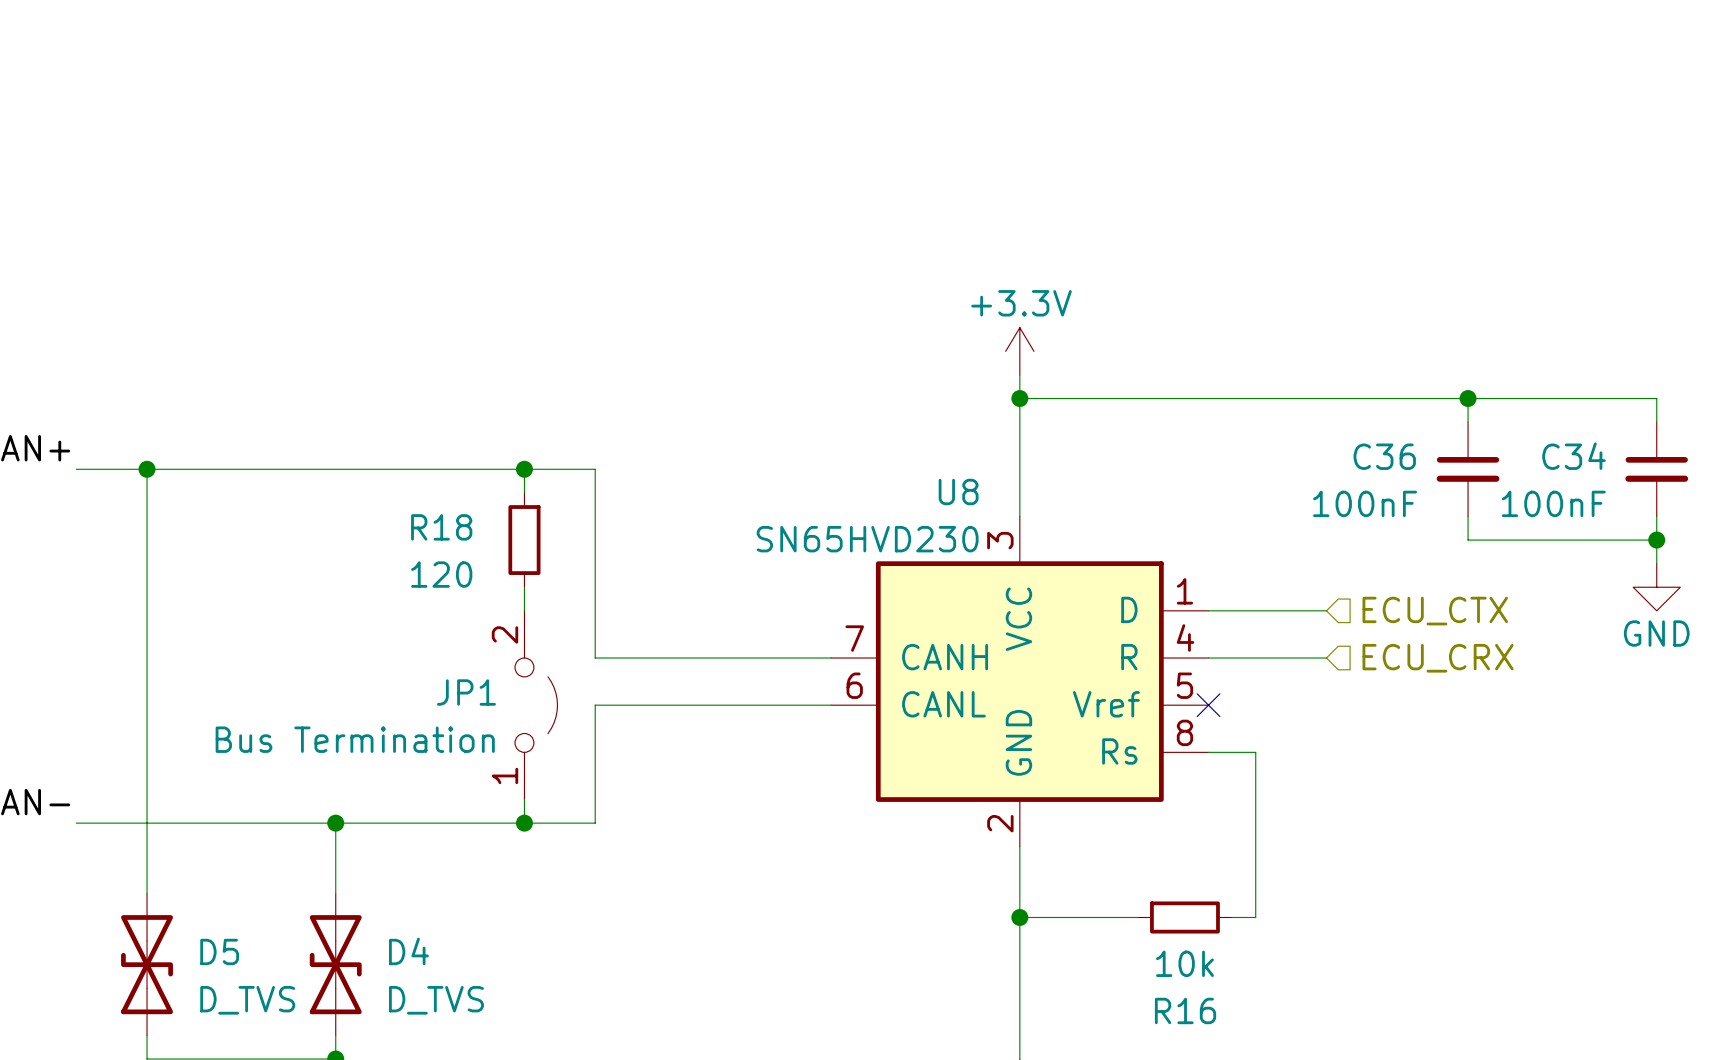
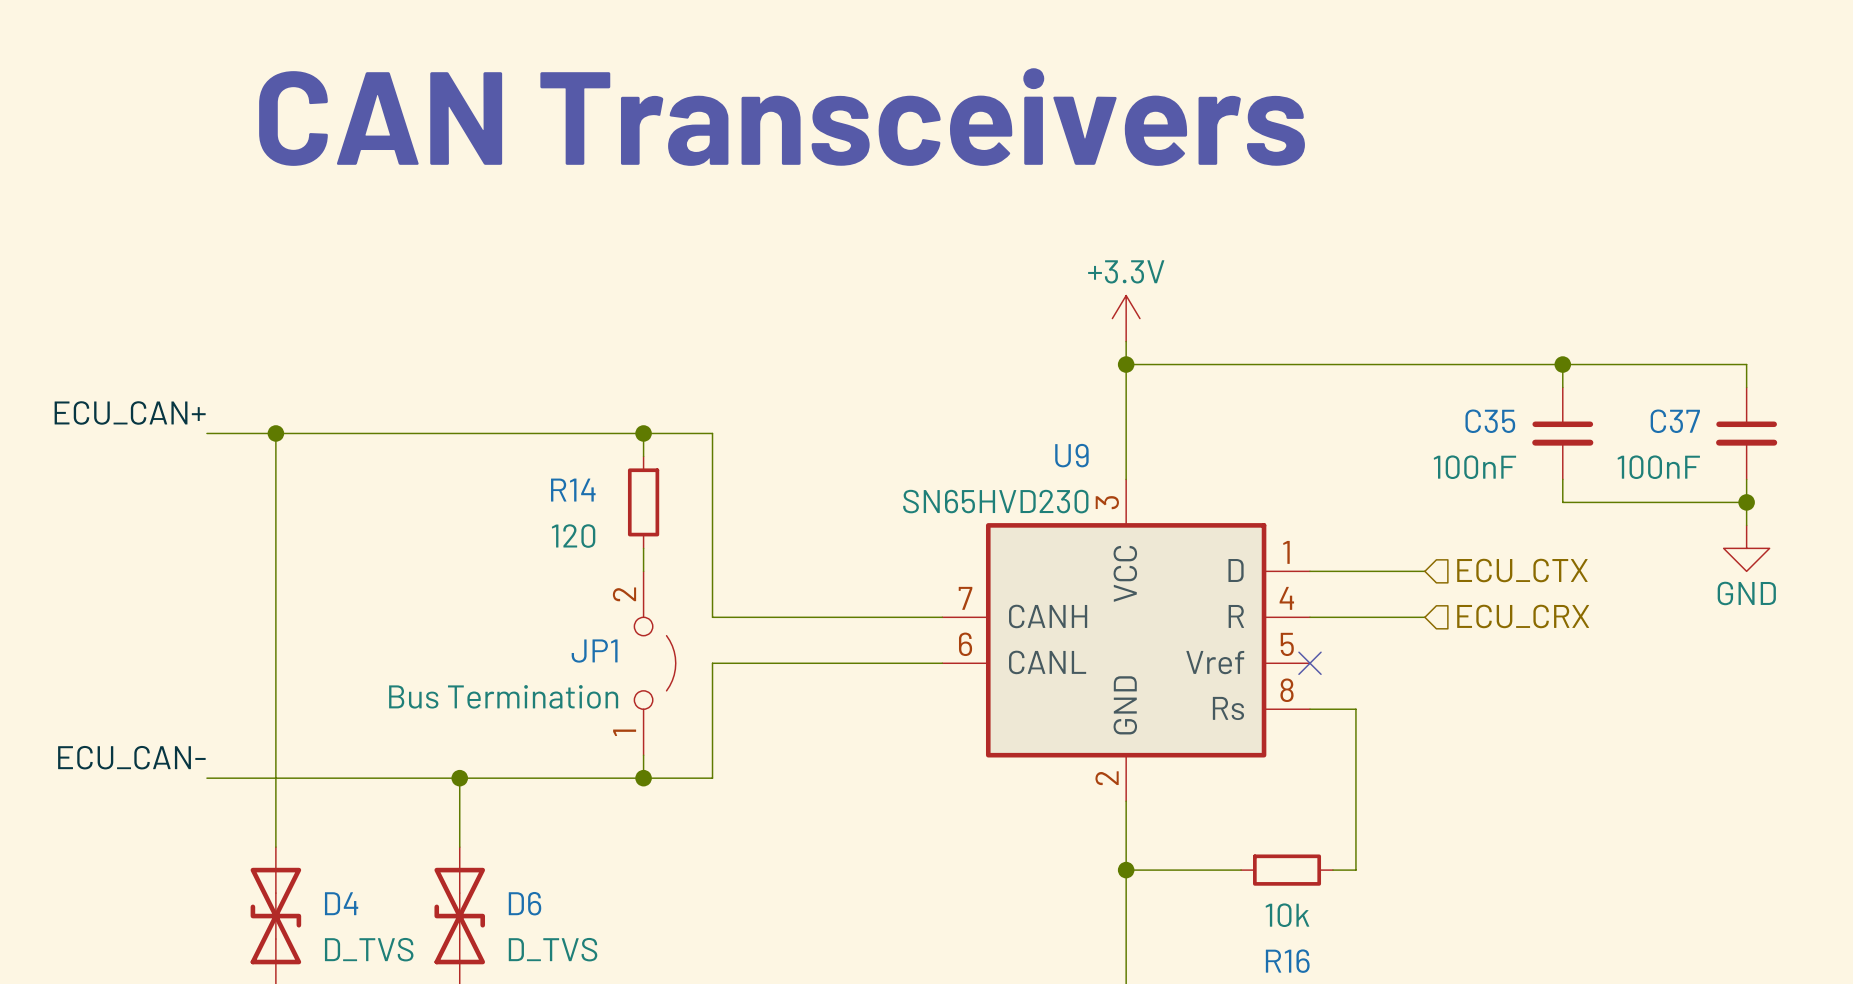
text: none -> CAN Transceivers (782, 117)
C36 name: C36 (1384, 456) -> C35 (1490, 421)
C34 name: C34 (1574, 456) -> C37 (1675, 421)
U8 name: U8 (958, 492) -> U9 (1071, 455)
R18 name: R18 (441, 527) -> R14 (573, 490)
D5 name: D5 (219, 951) -> D4 (341, 903)
D4 name: D4 (408, 951) -> D6 (525, 903)

